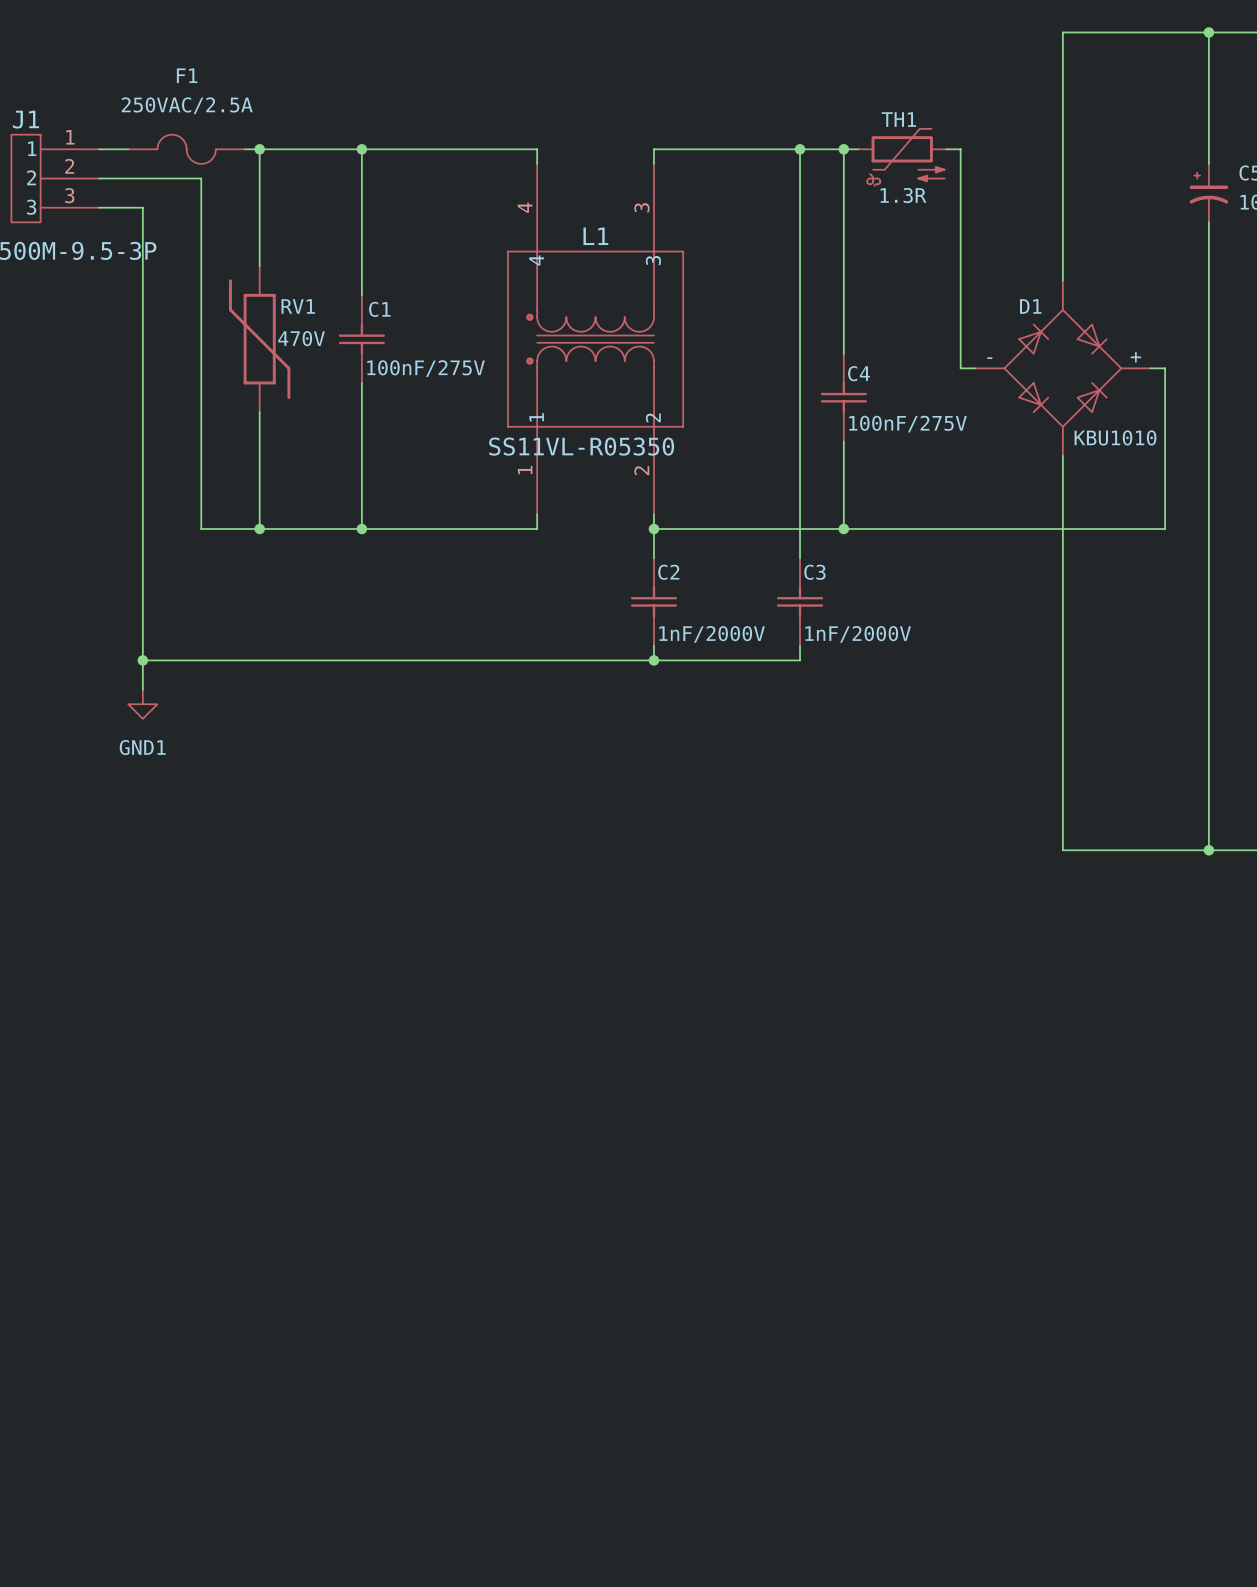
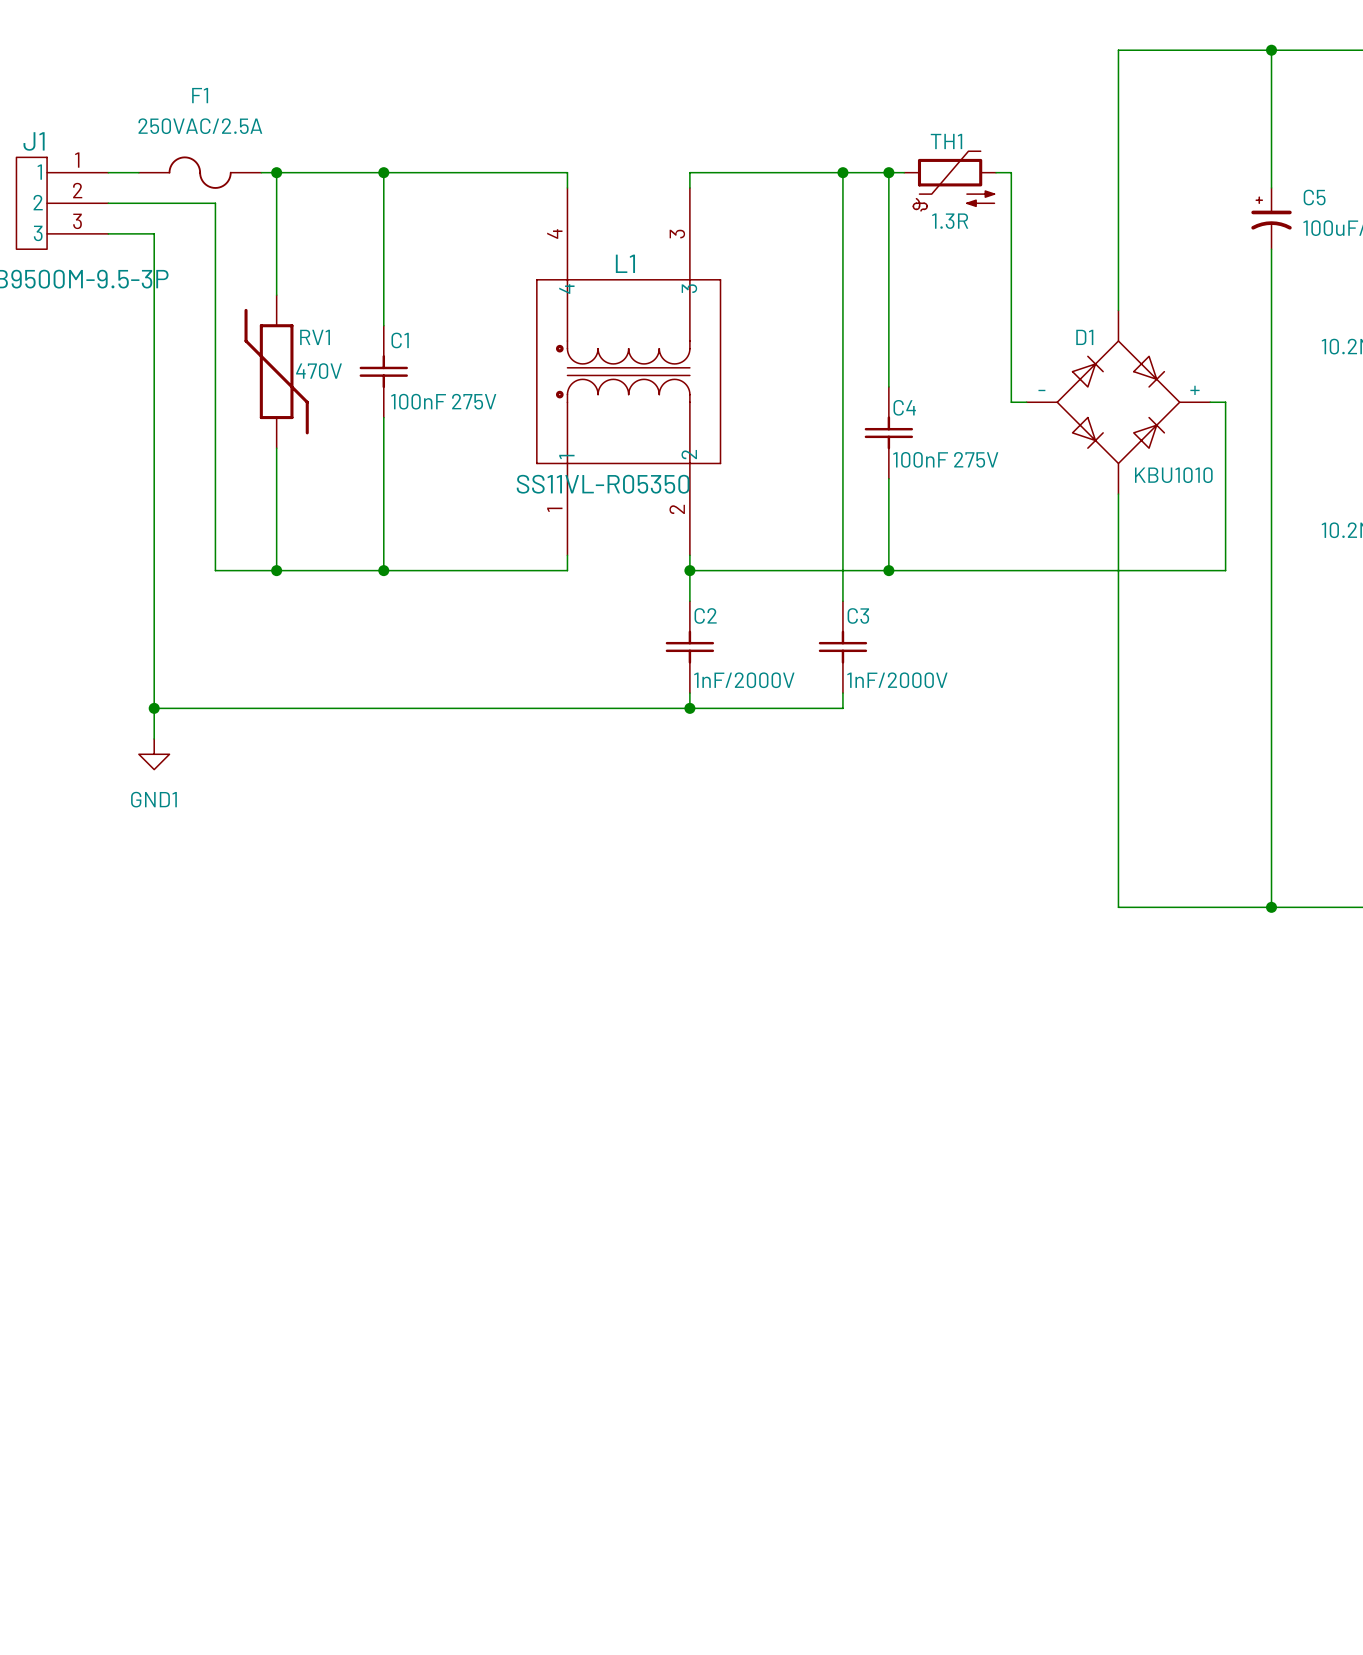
C1 value: 100nF/275V (426, 368) -> 100nF 275V (443, 401)
C4 value: 100nF/275V (907, 424) -> 100nF 275V (945, 459)

